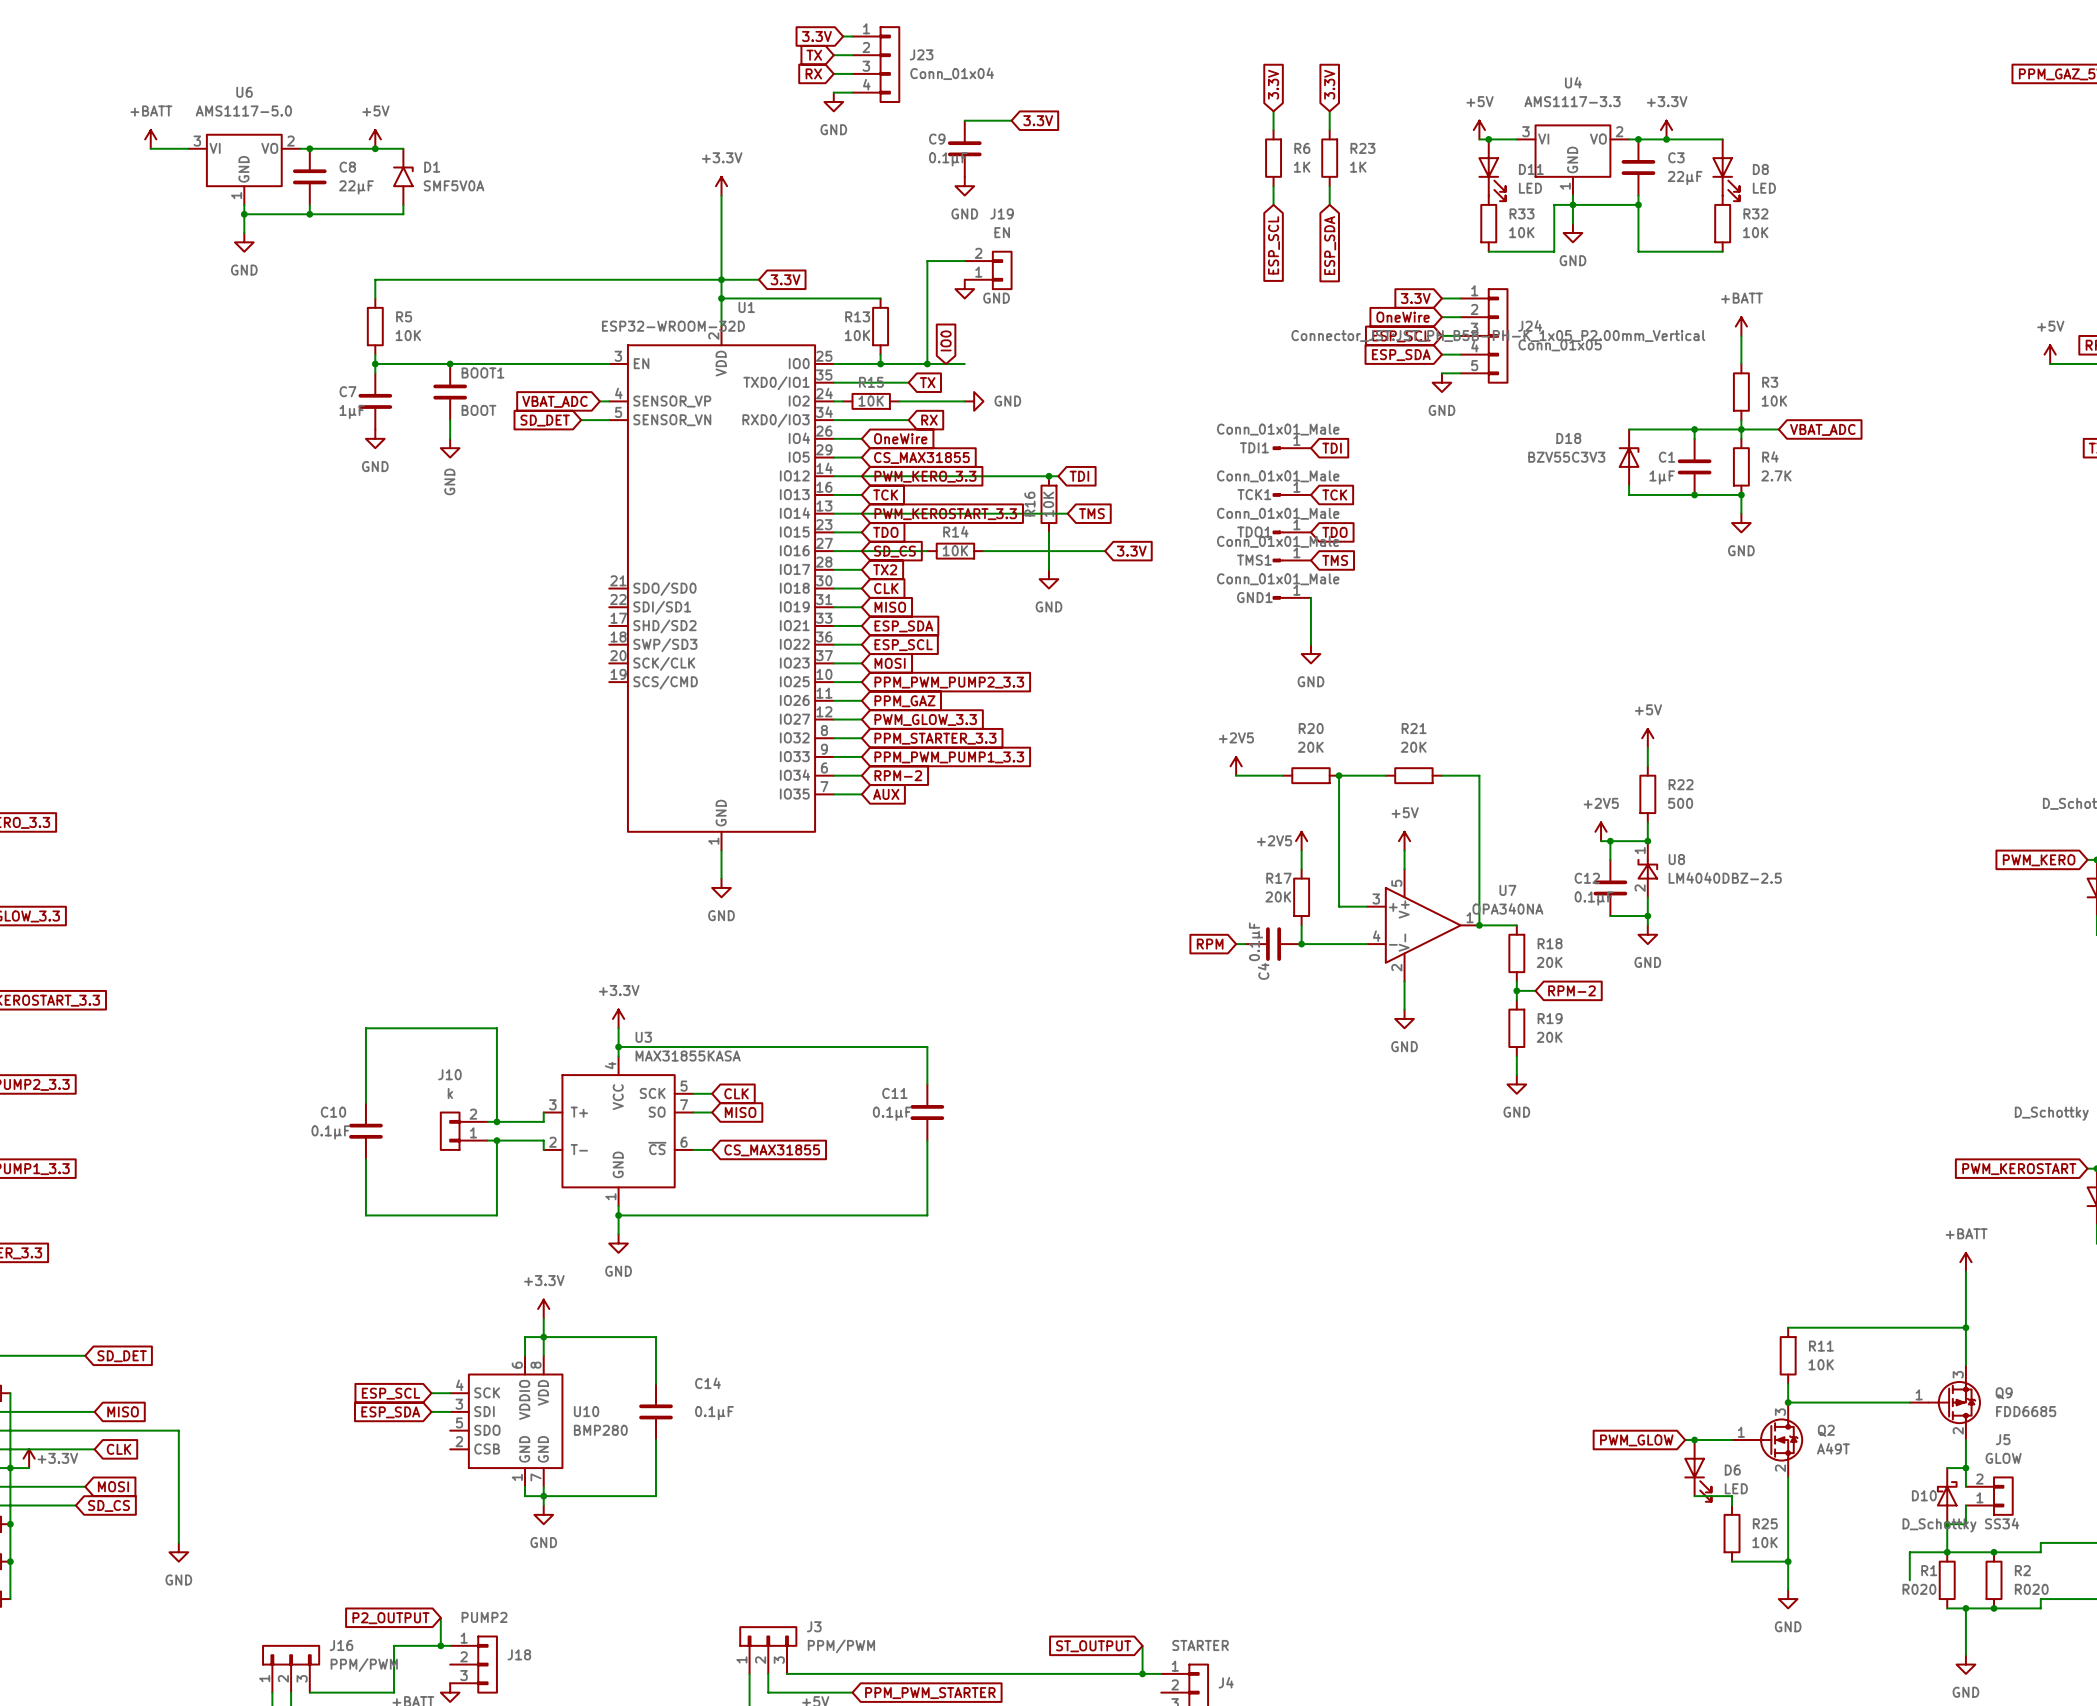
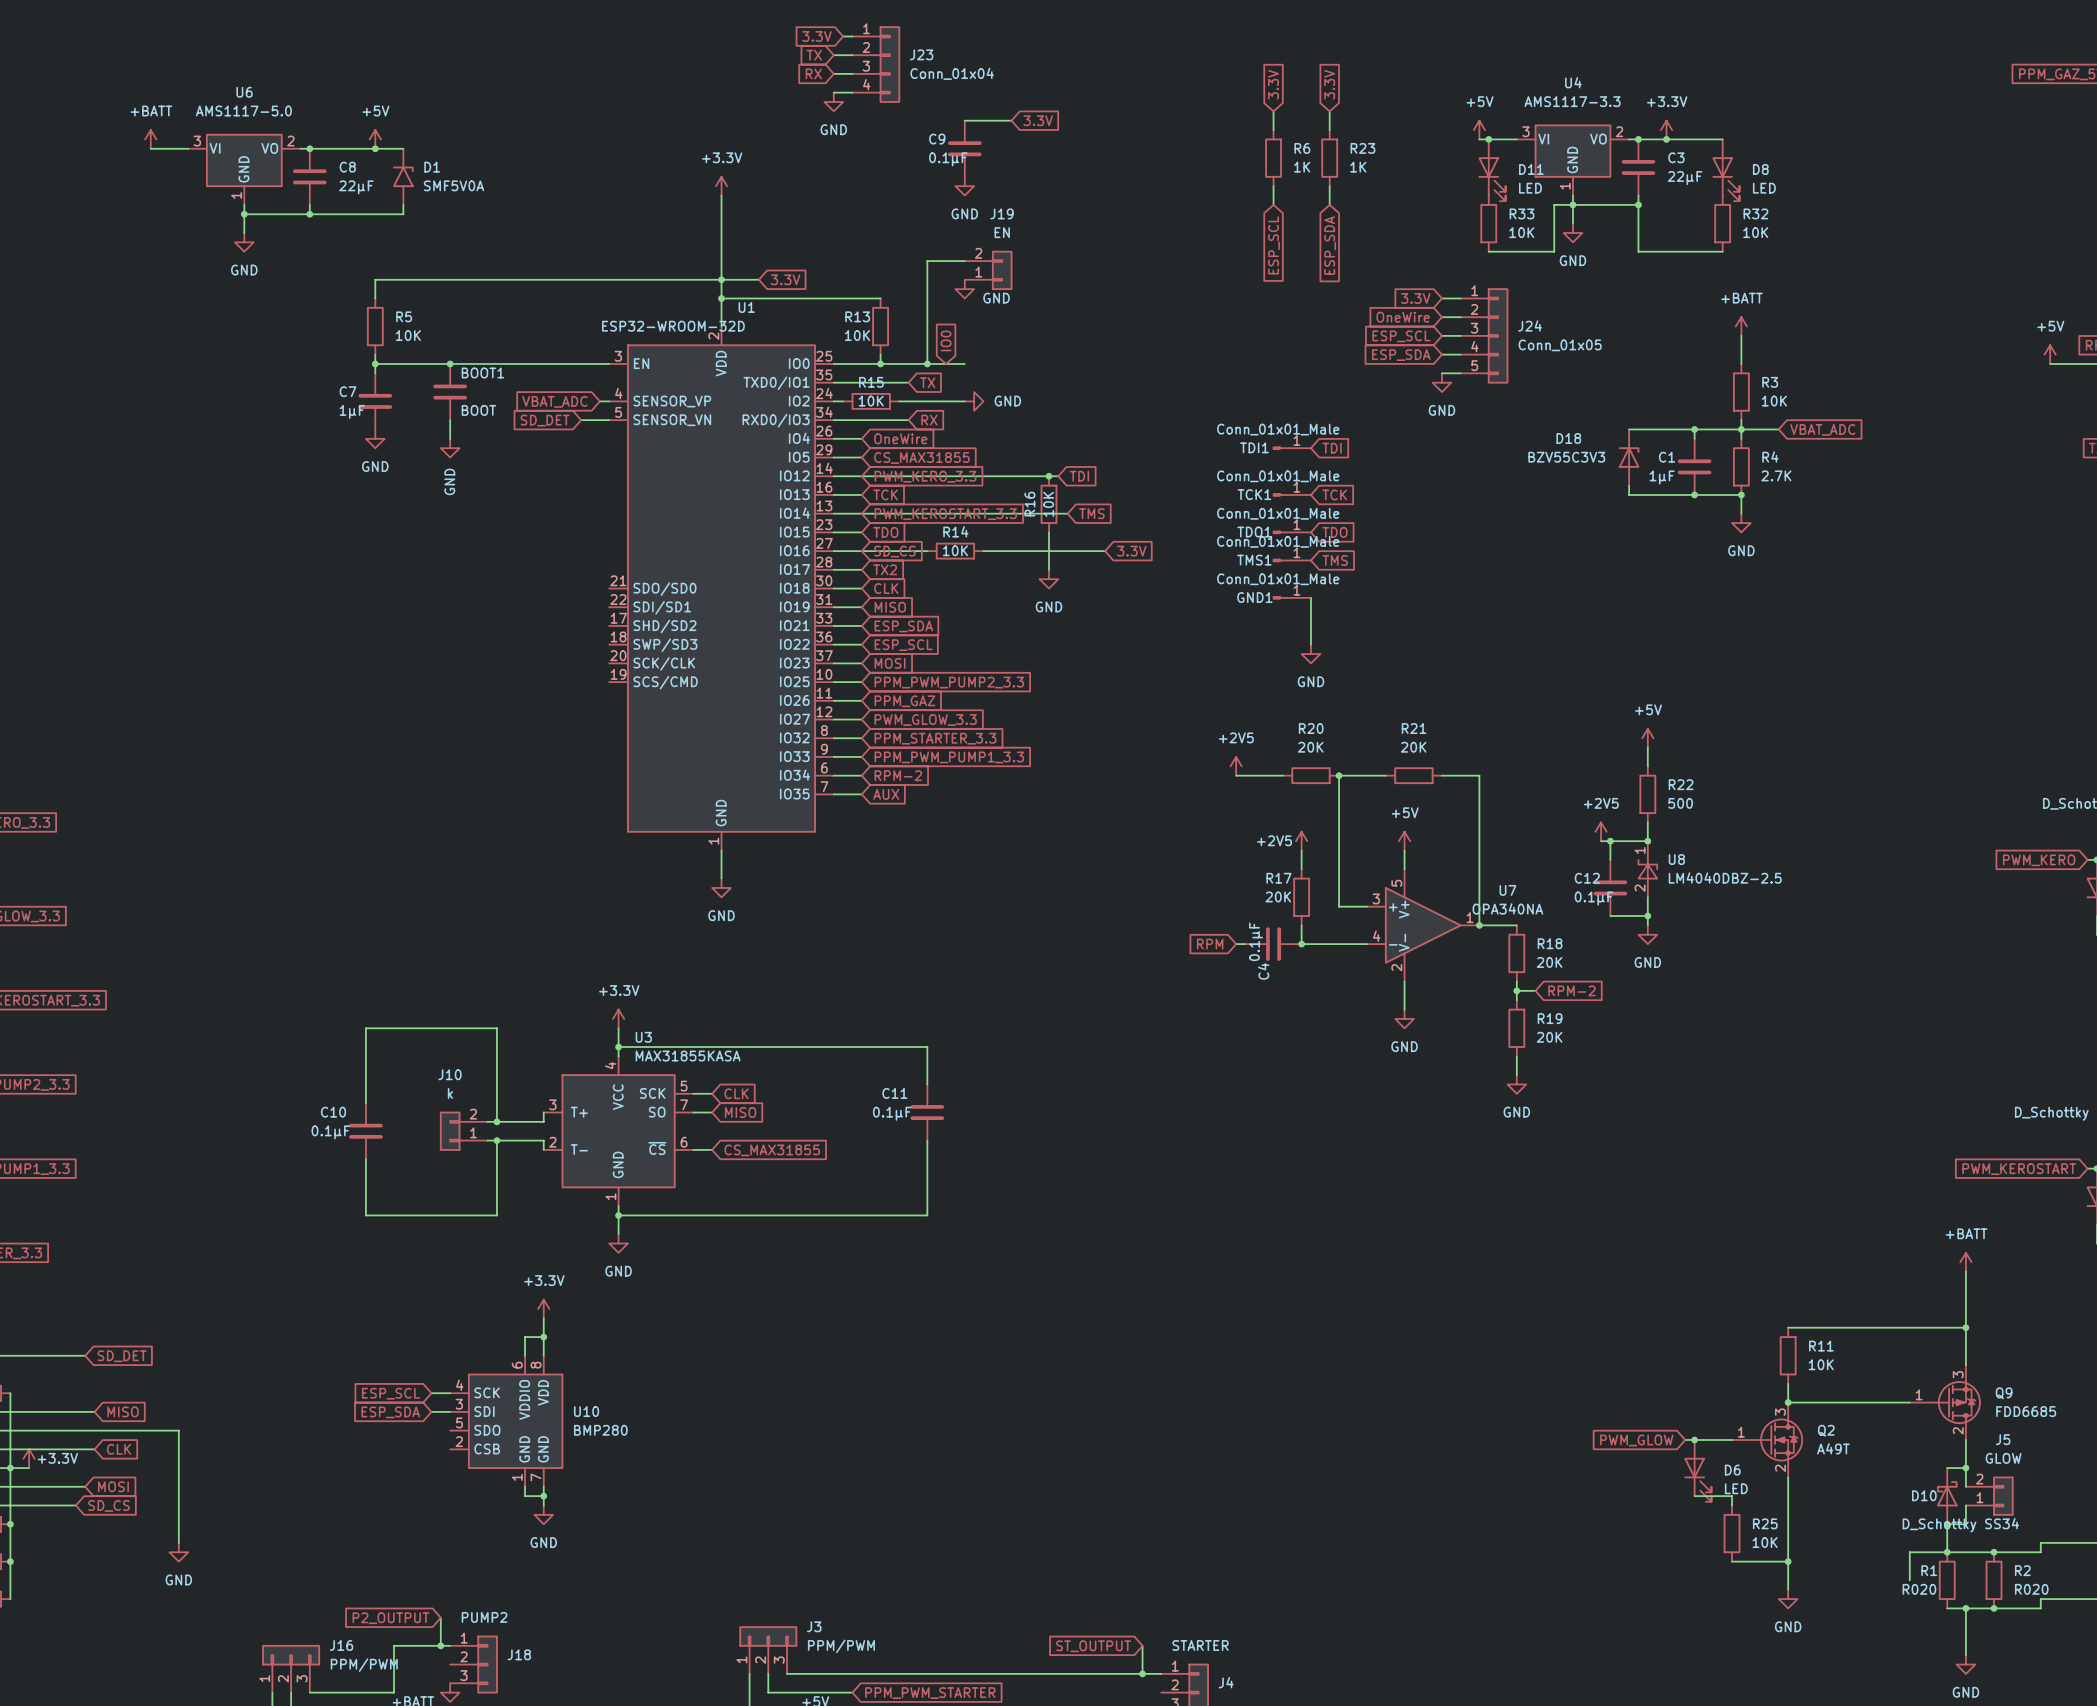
J24 text: Connector_JST:JST_PH_B5B-PH-K_1x05_P2.00mm_Vertical (1498, 336) -> none
wire: (543, 1337) (656, 1337) (656, 1383) -> none
C14: 0.1µF (656, 1411) -> none
wire: (656, 1440) (656, 1496) (543, 1496) -> none

